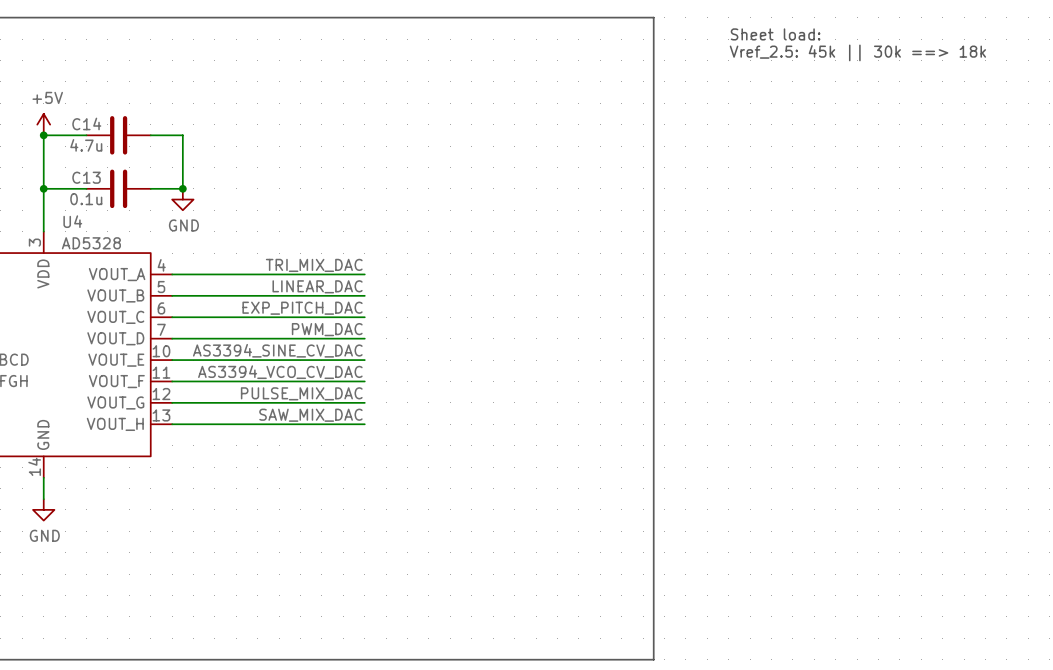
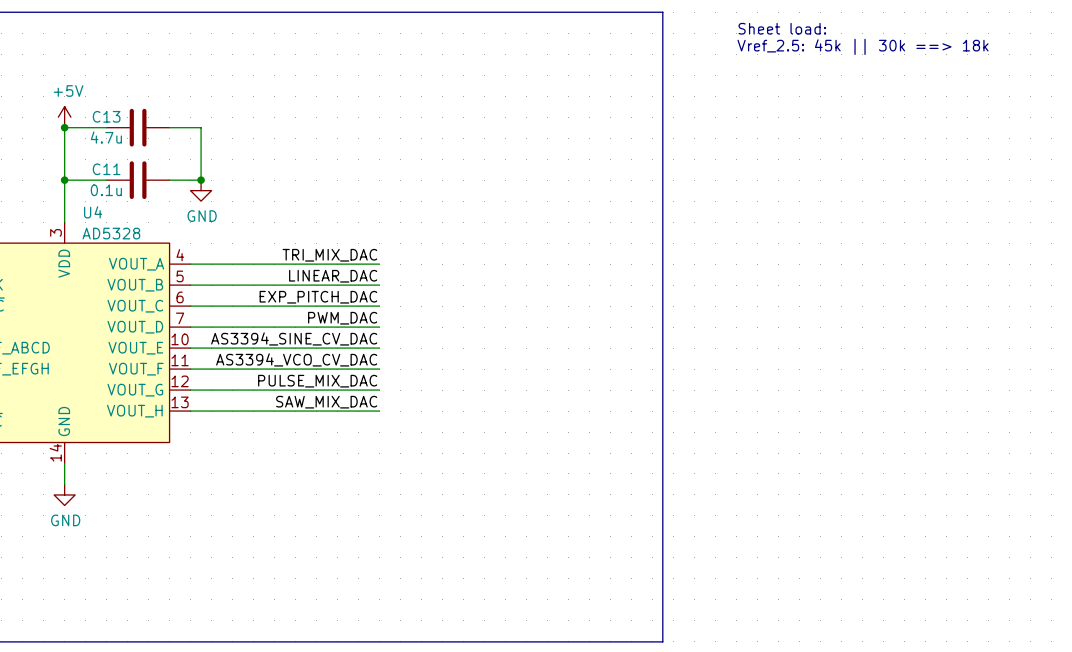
C14 name: C14 (86, 123) -> C13 (106, 116)
C13 name: C13 (86, 177) -> C11 (106, 169)

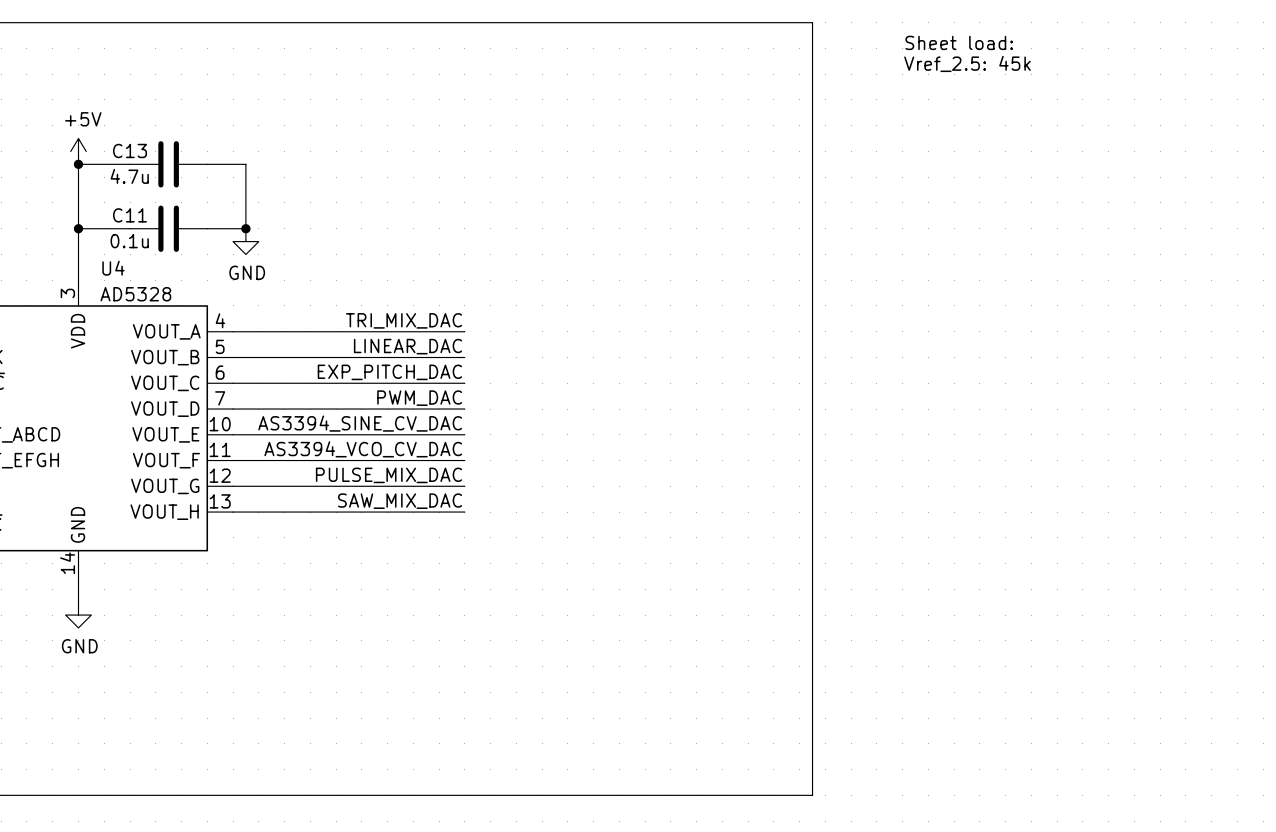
text: Vref_2.5: 45k || 30k ==> 18k (863, 46) -> Vref_2.5: 45k (967, 63)

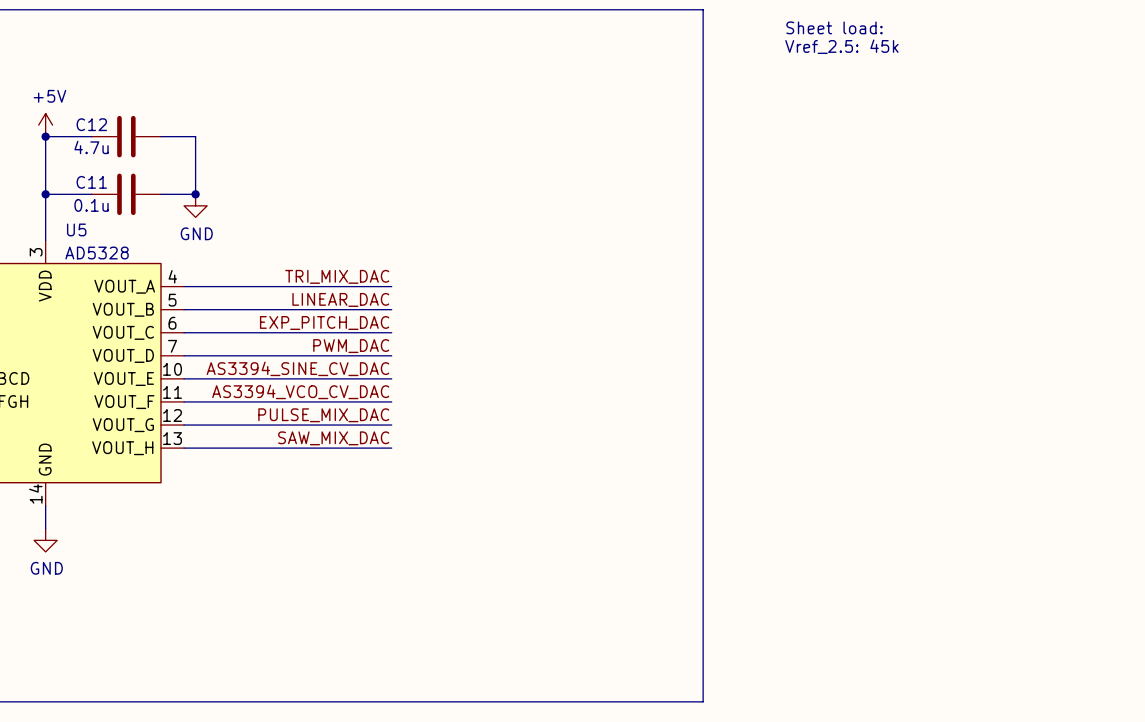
C13 name: C13 (130, 150) -> C12 (91, 124)
U4 name: U4 (113, 268) -> U5 (76, 229)

